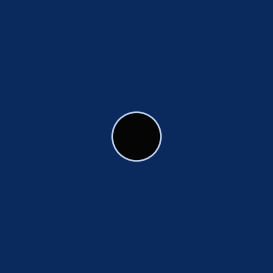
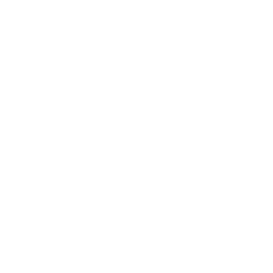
hole: (136, 136) -> none

